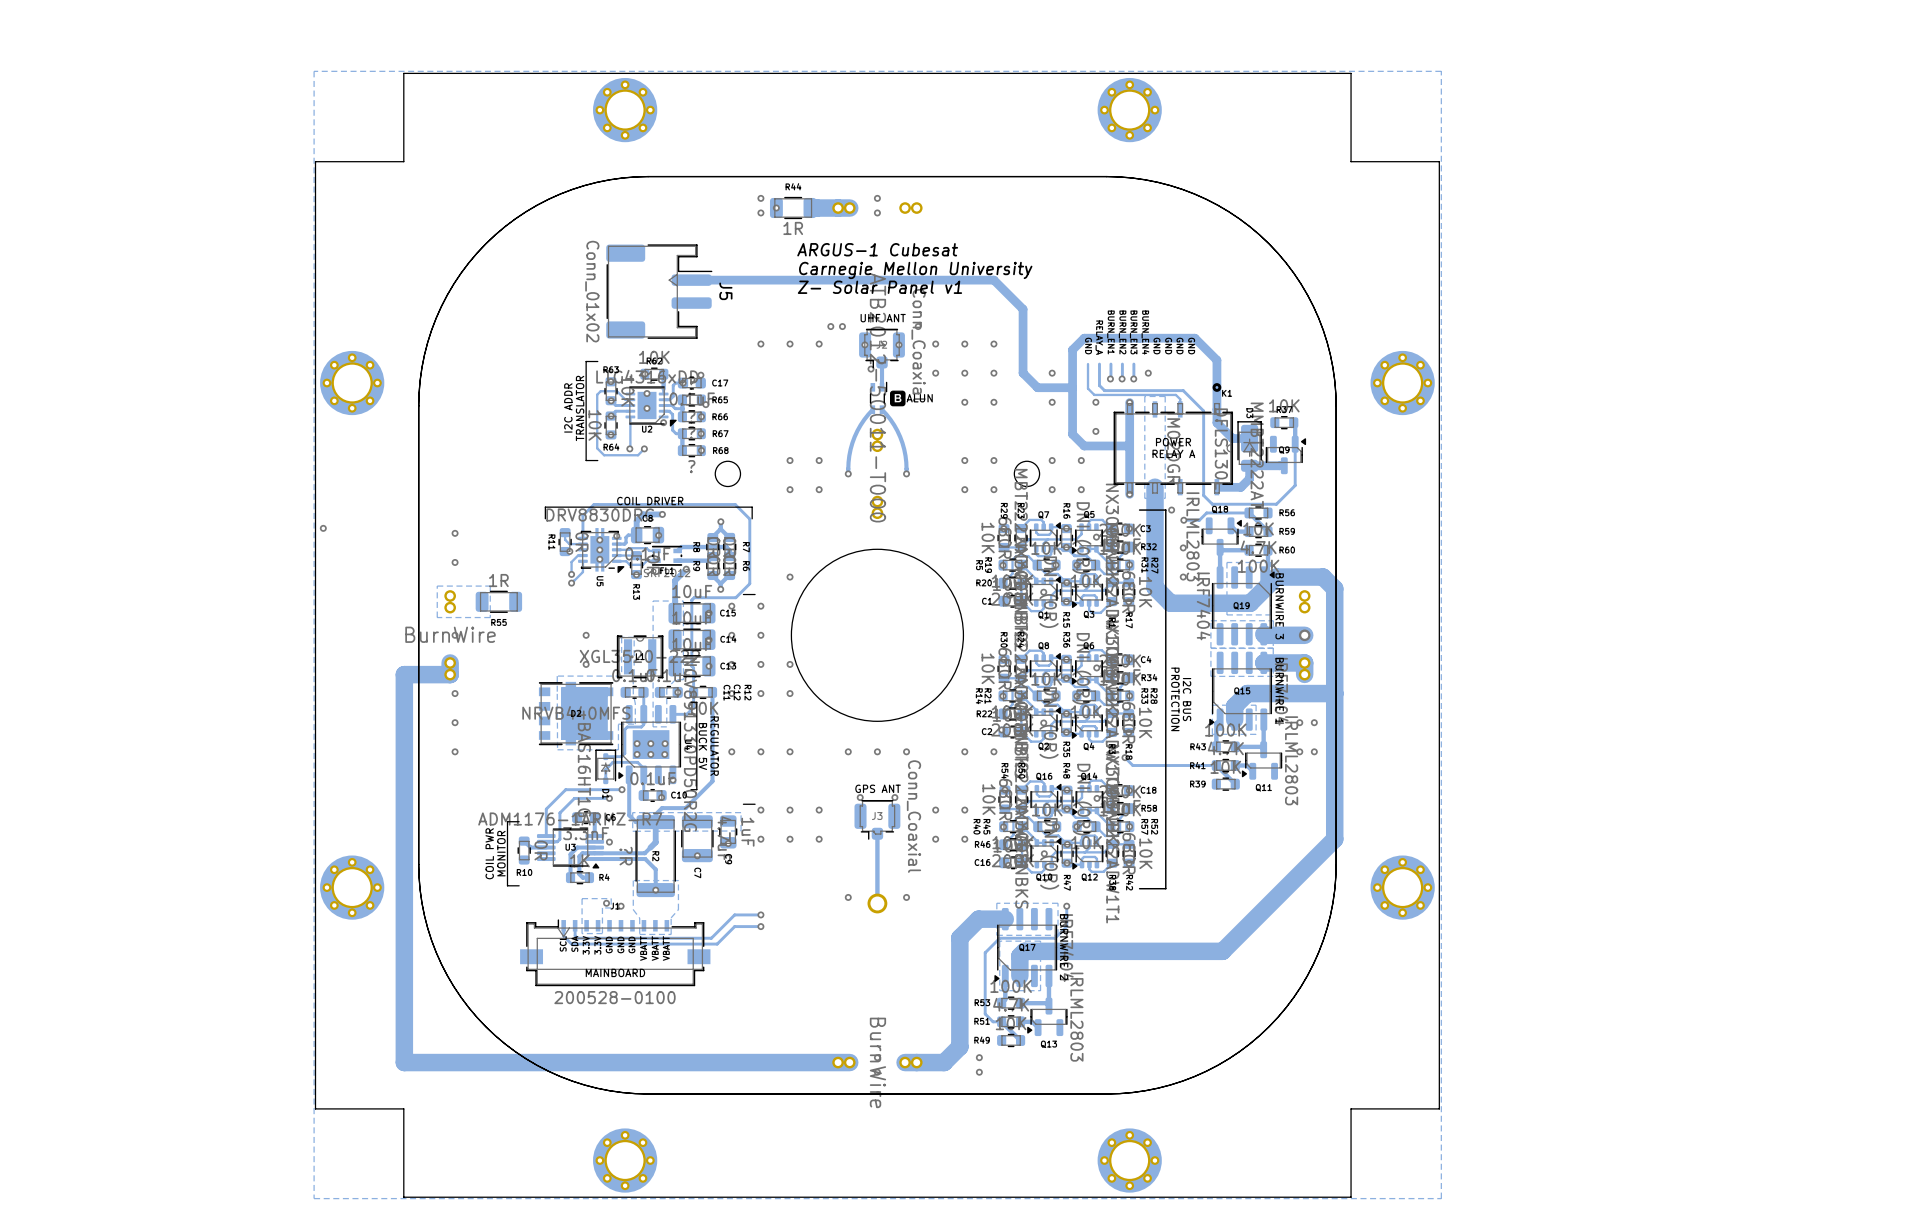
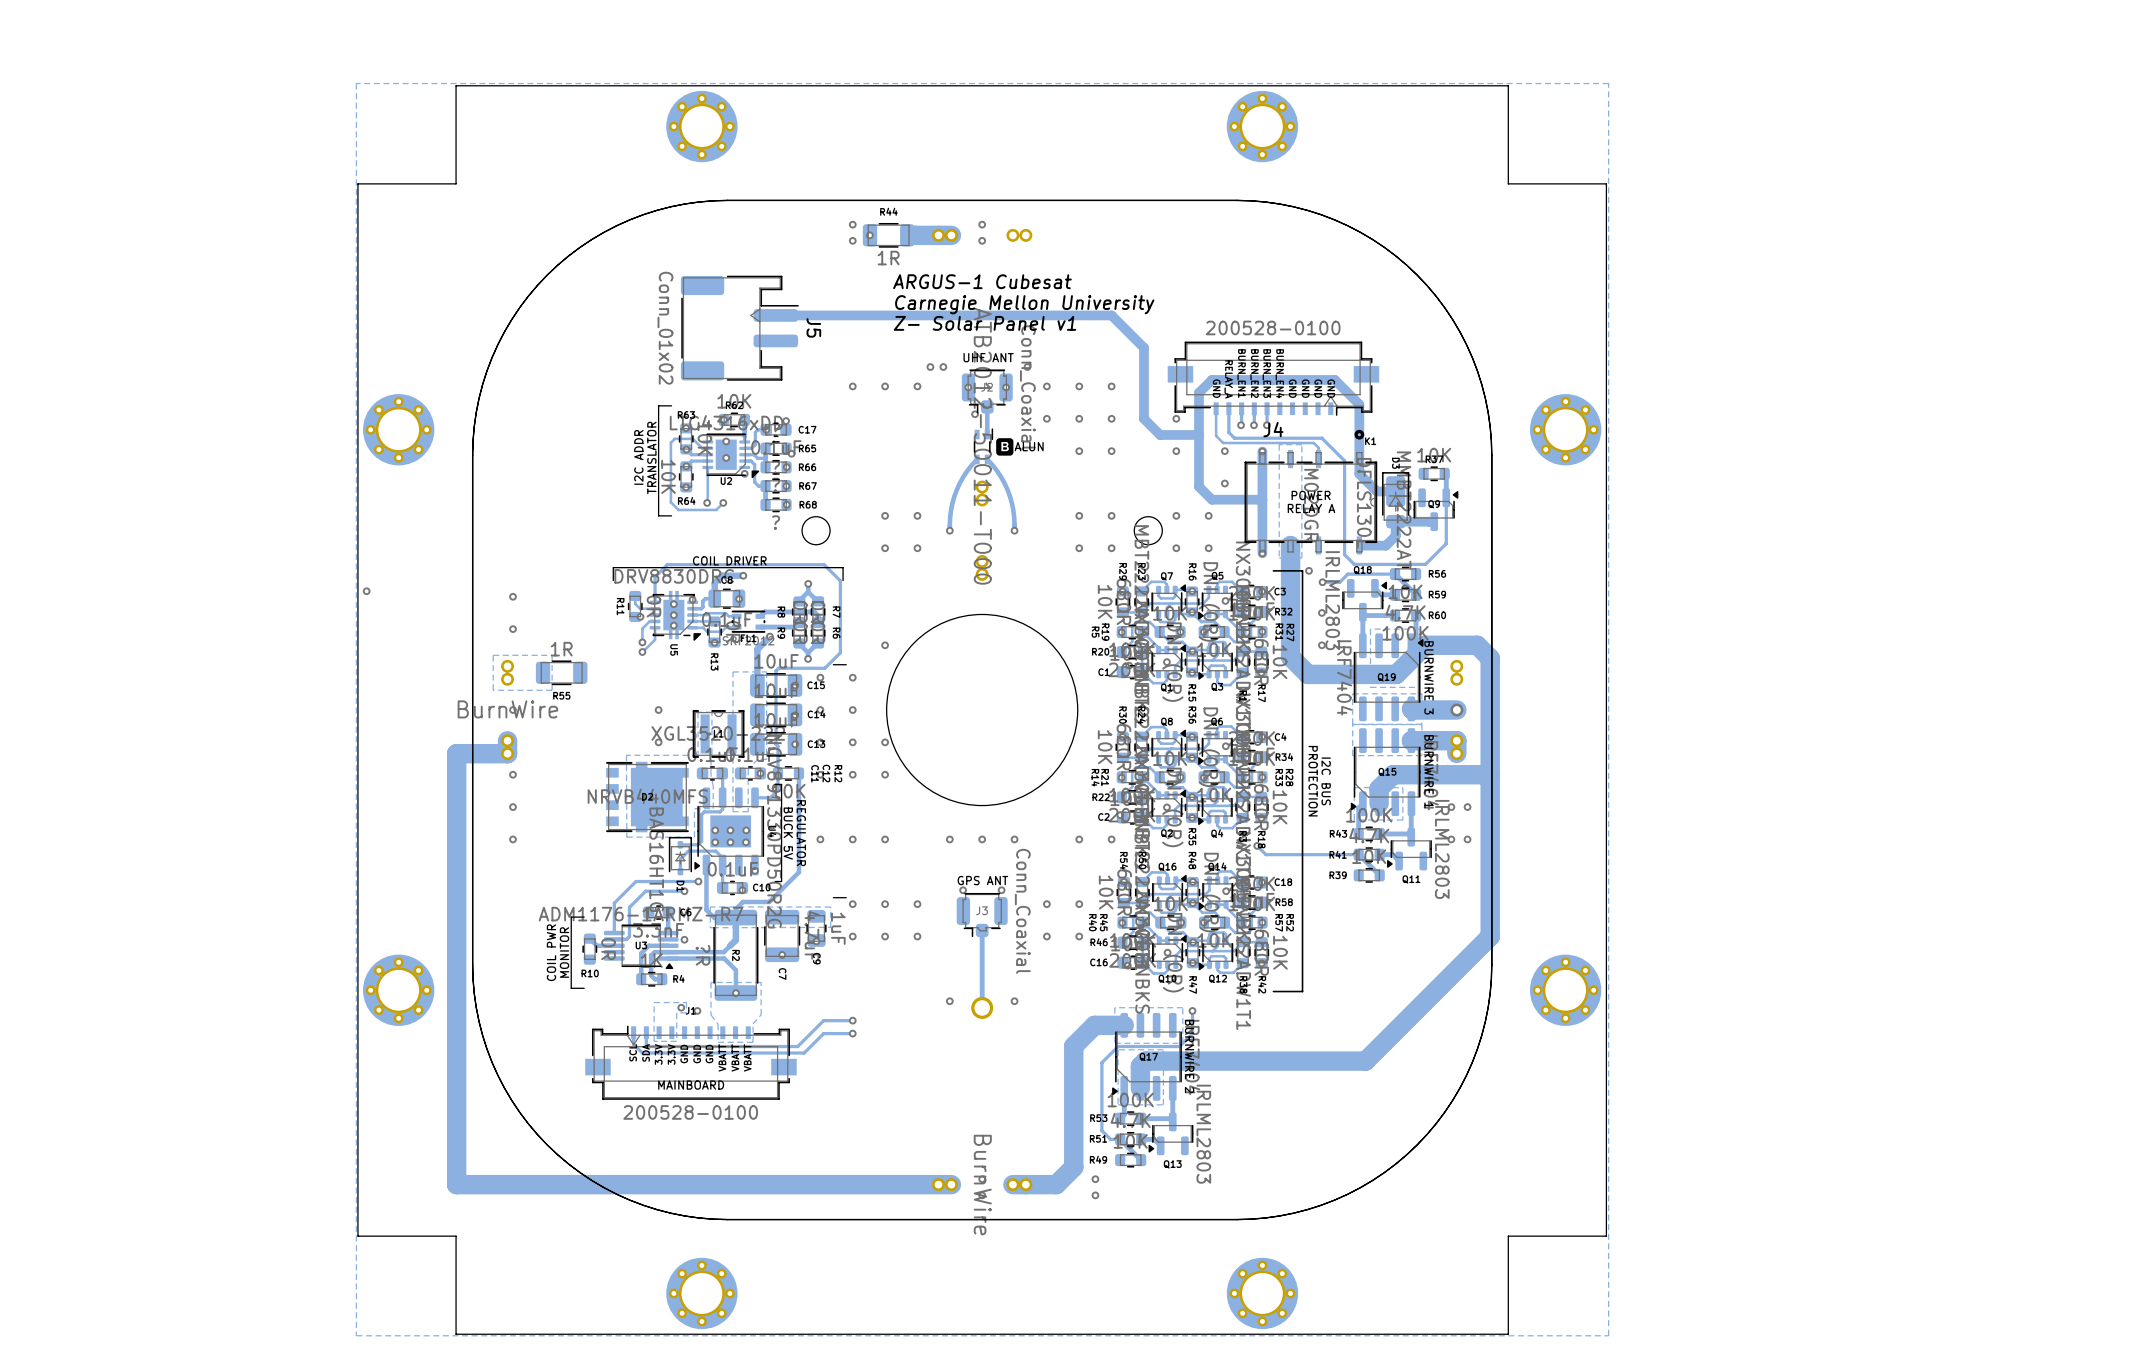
J4: none -> 200528-0100 (1273, 378)
via: (1148, 373) -> none

